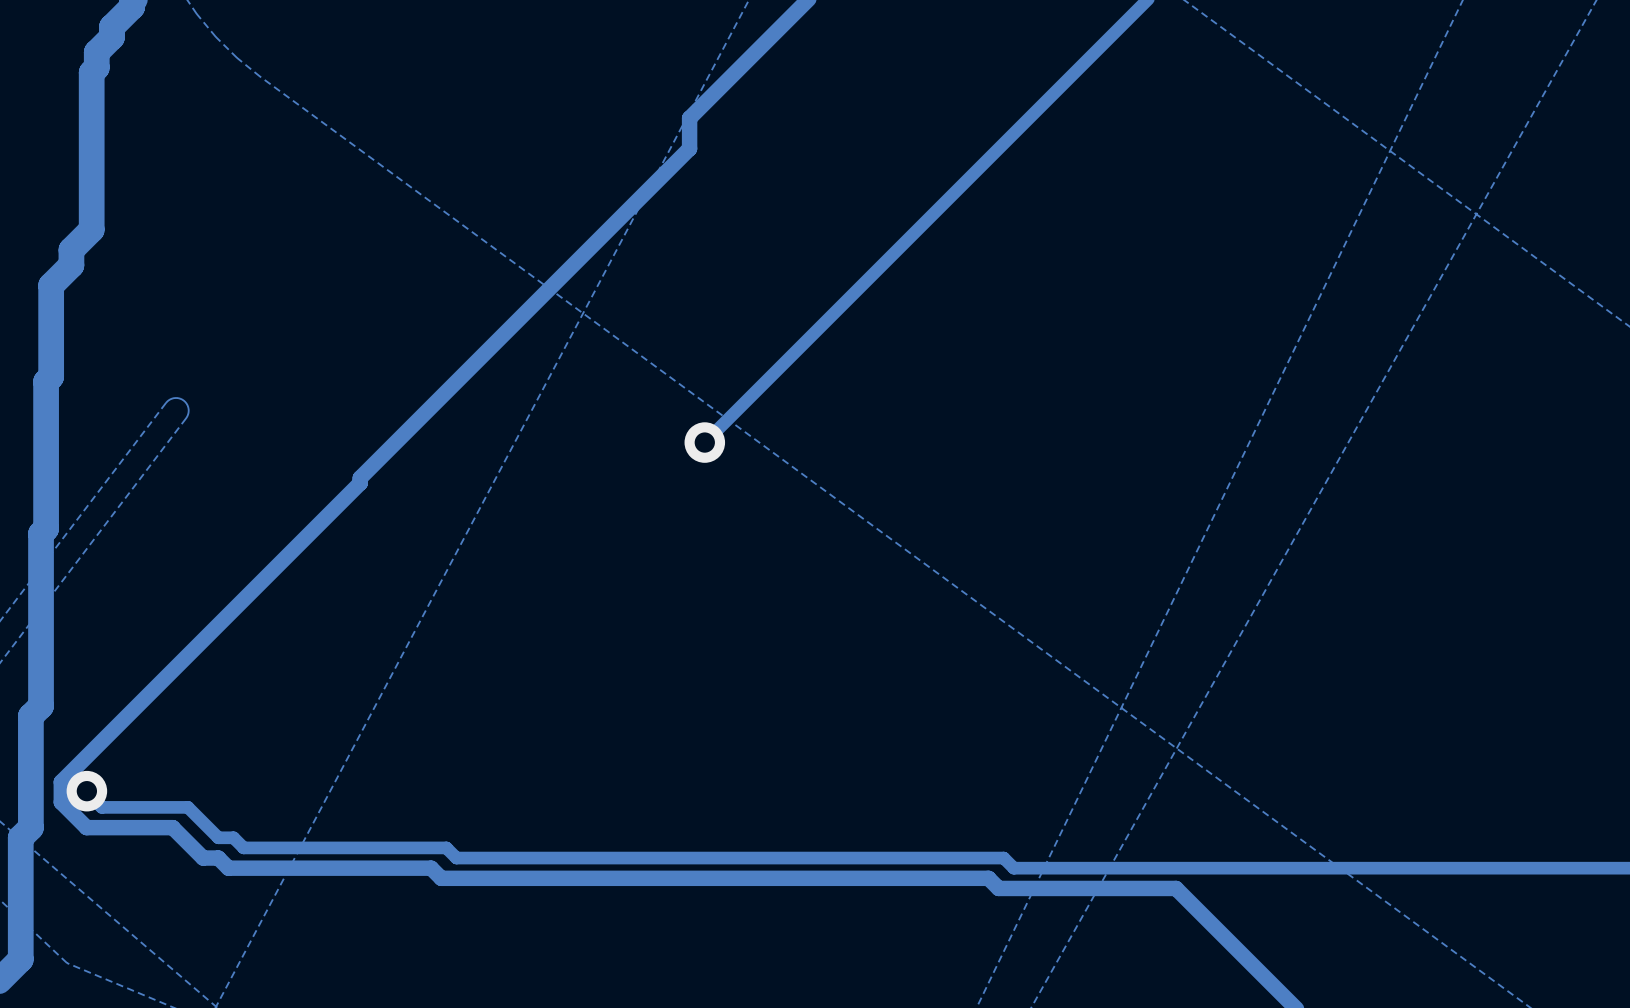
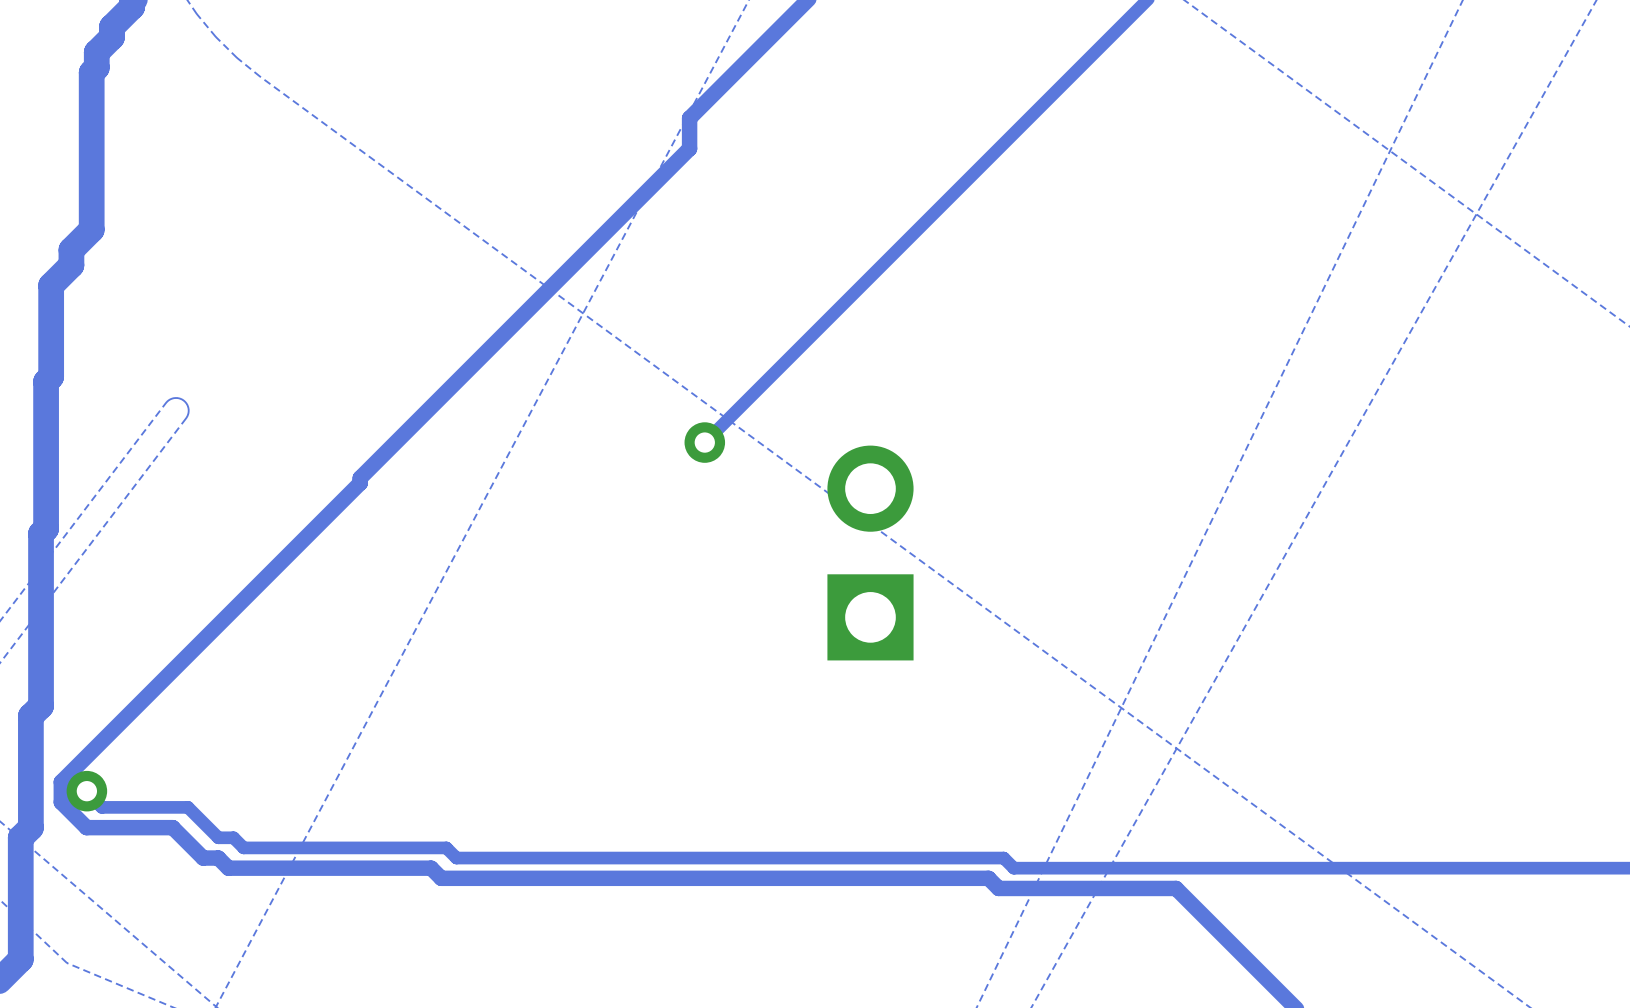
part: none -> (870, 553)

